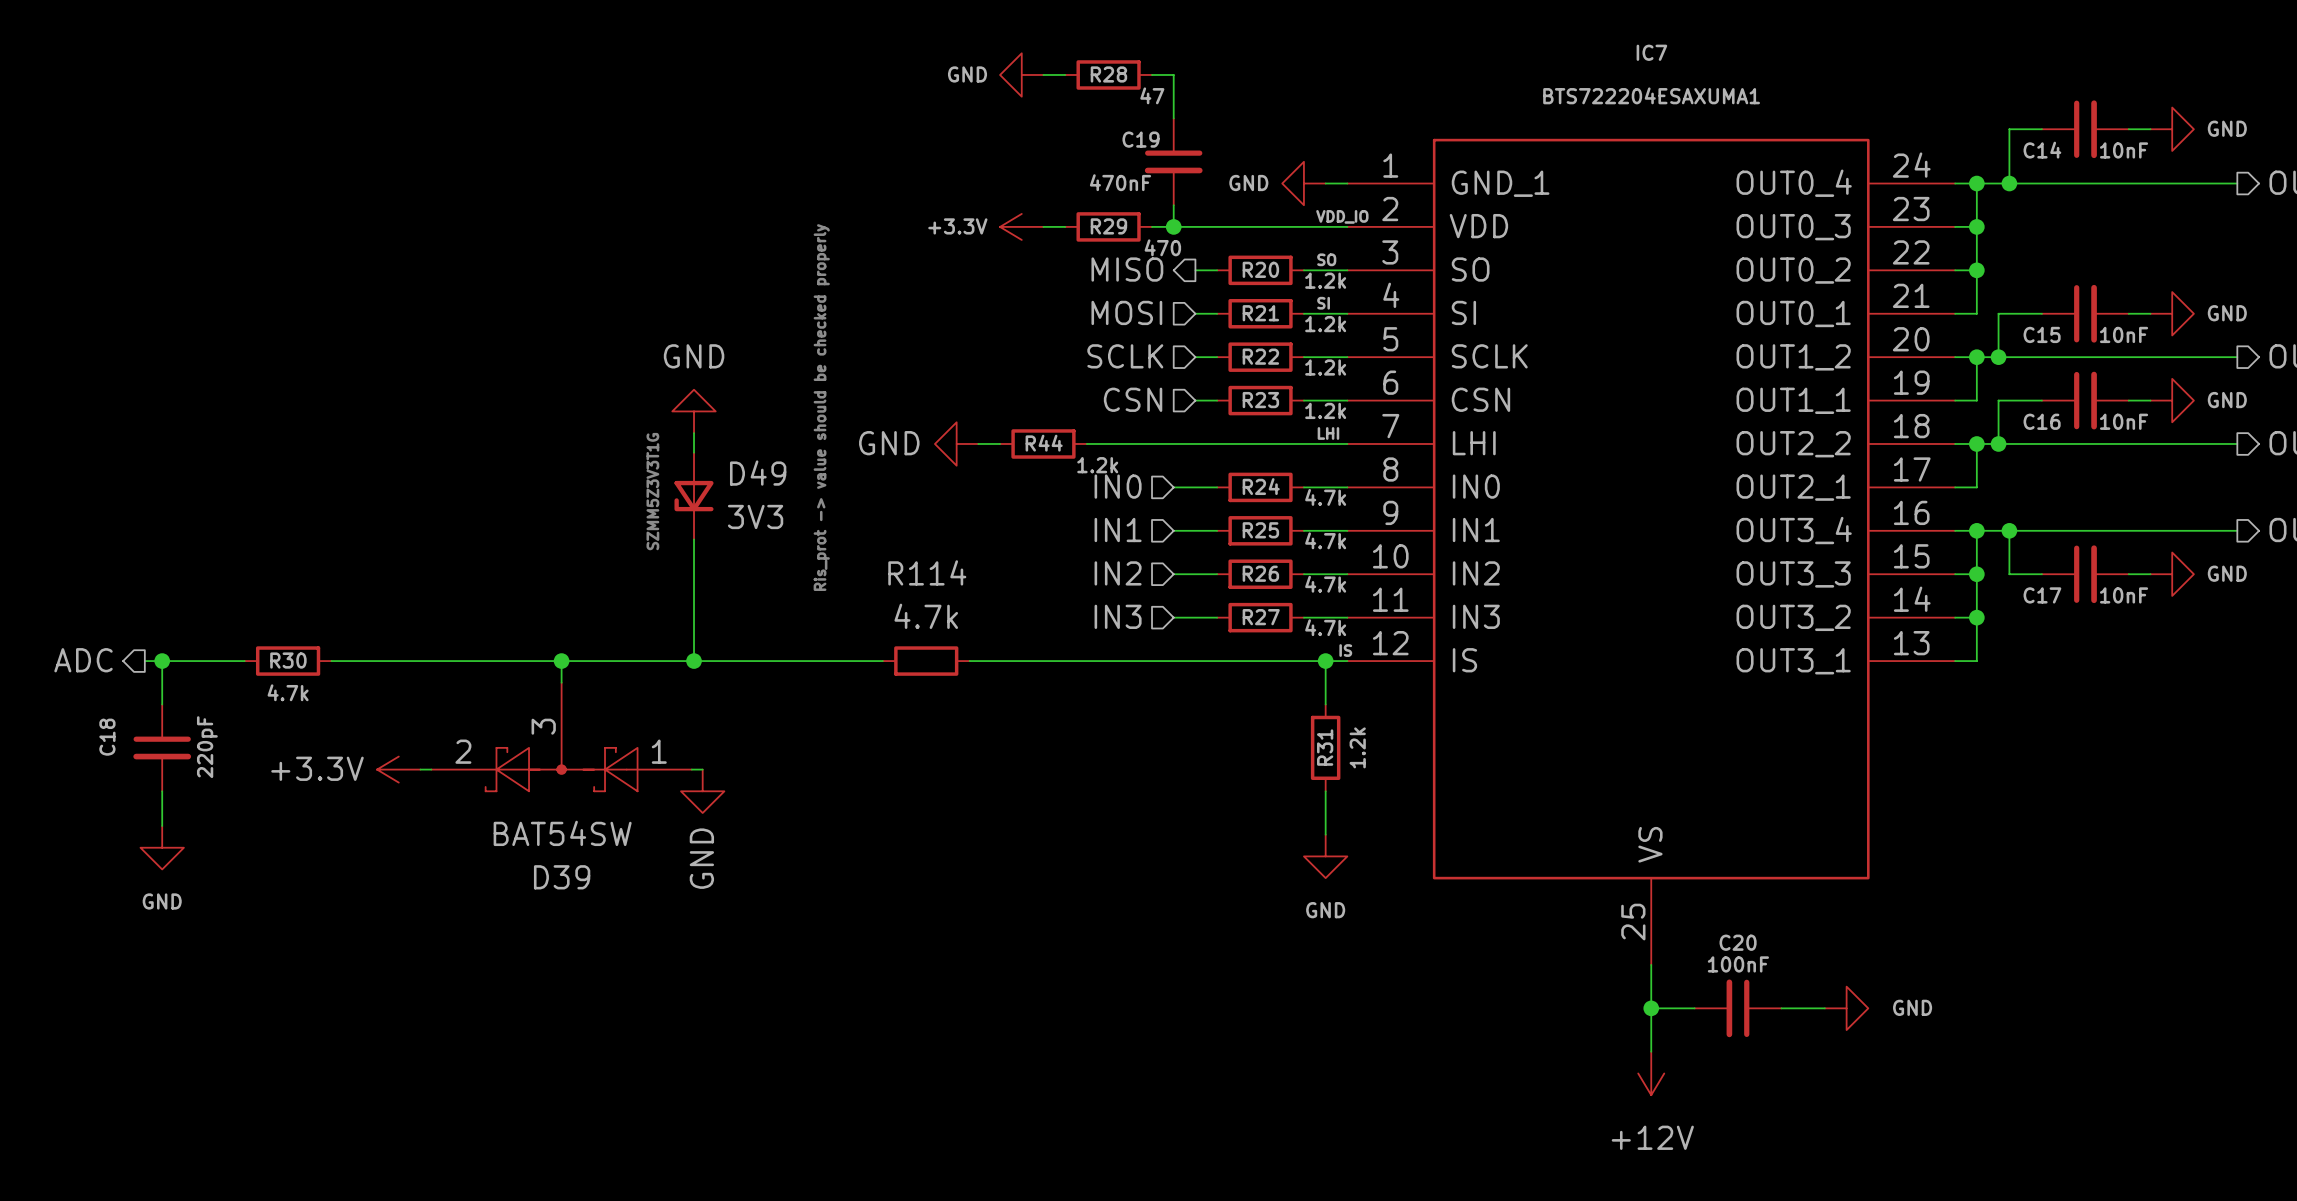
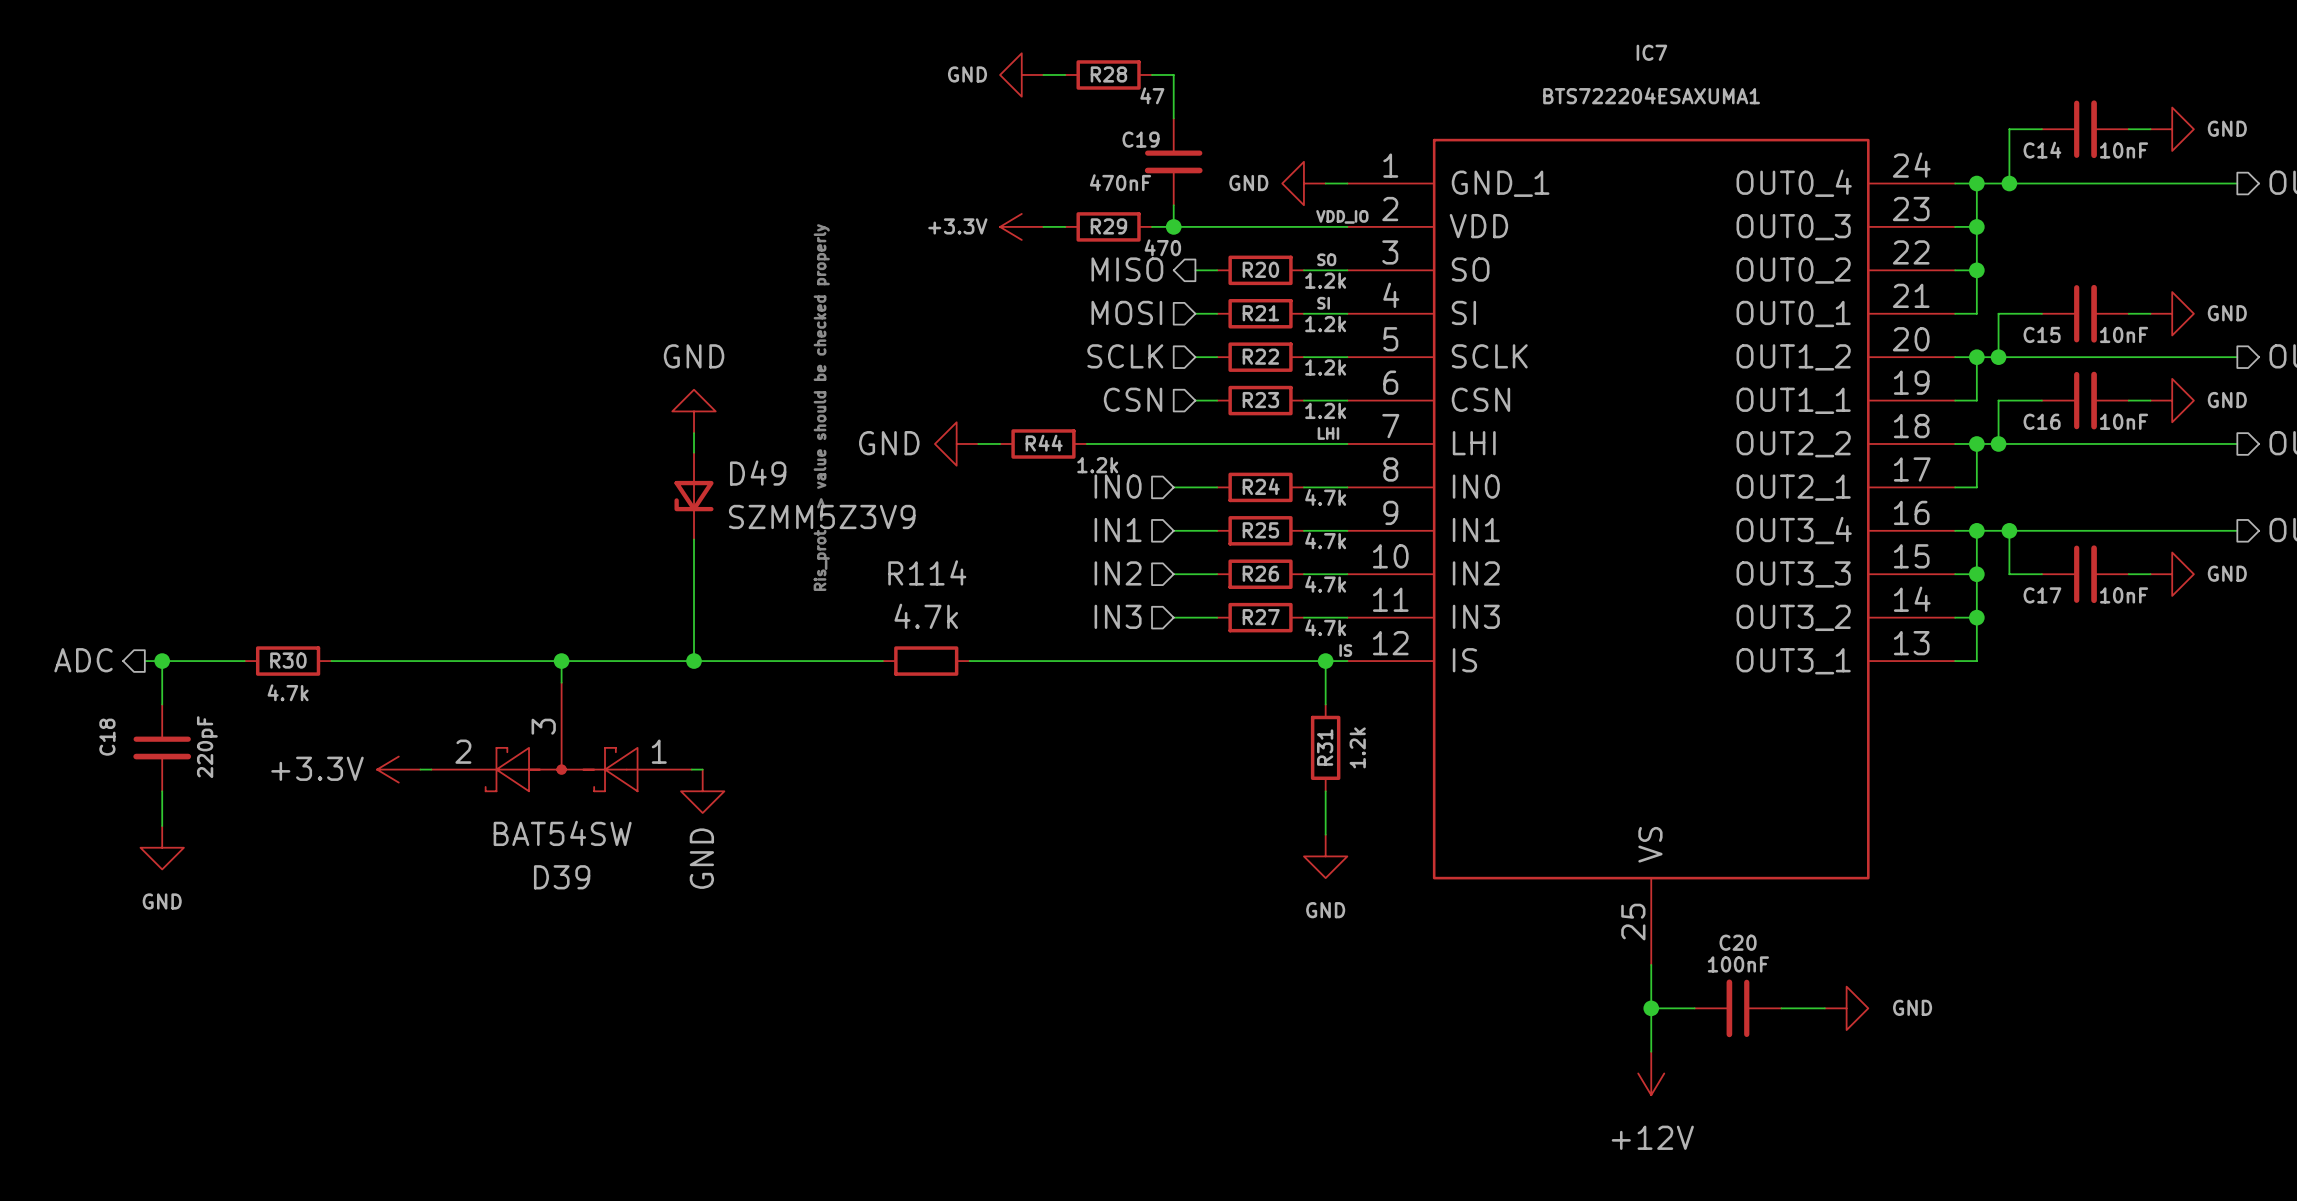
text: SZMM5Z3V3T1G (652, 491) -> none
D49 value: 3V3 (755, 516) -> SZMM5Z3V9 (822, 516)

